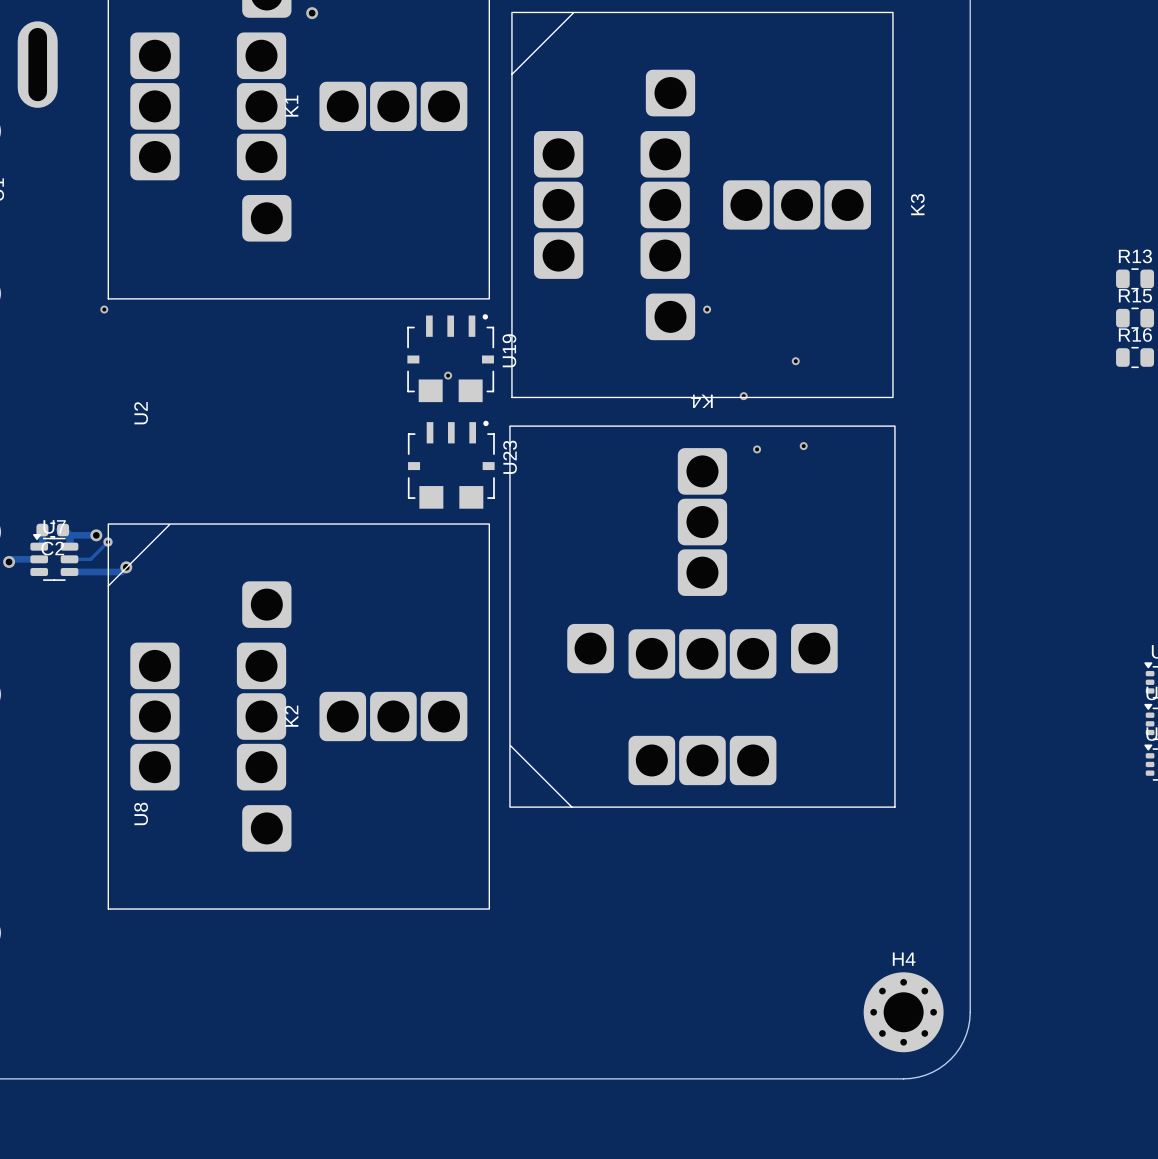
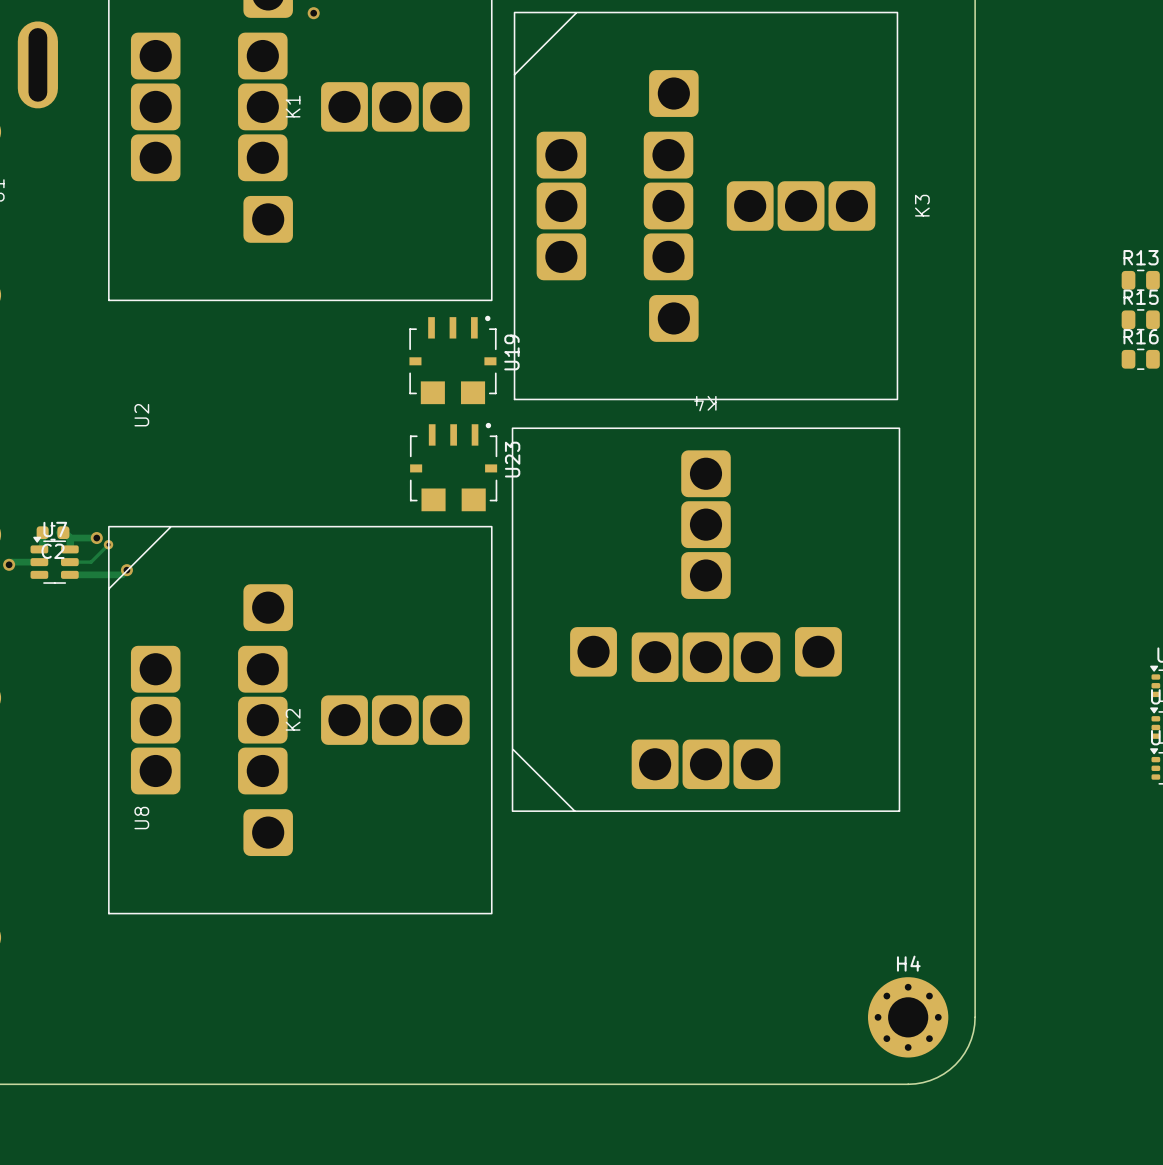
via: (104, 309) -> none
via: (707, 309) -> none
via: (795, 361) -> none
via: (448, 375) -> none
via: (743, 396) -> none
via: (803, 446) -> none
via: (757, 449) -> none

